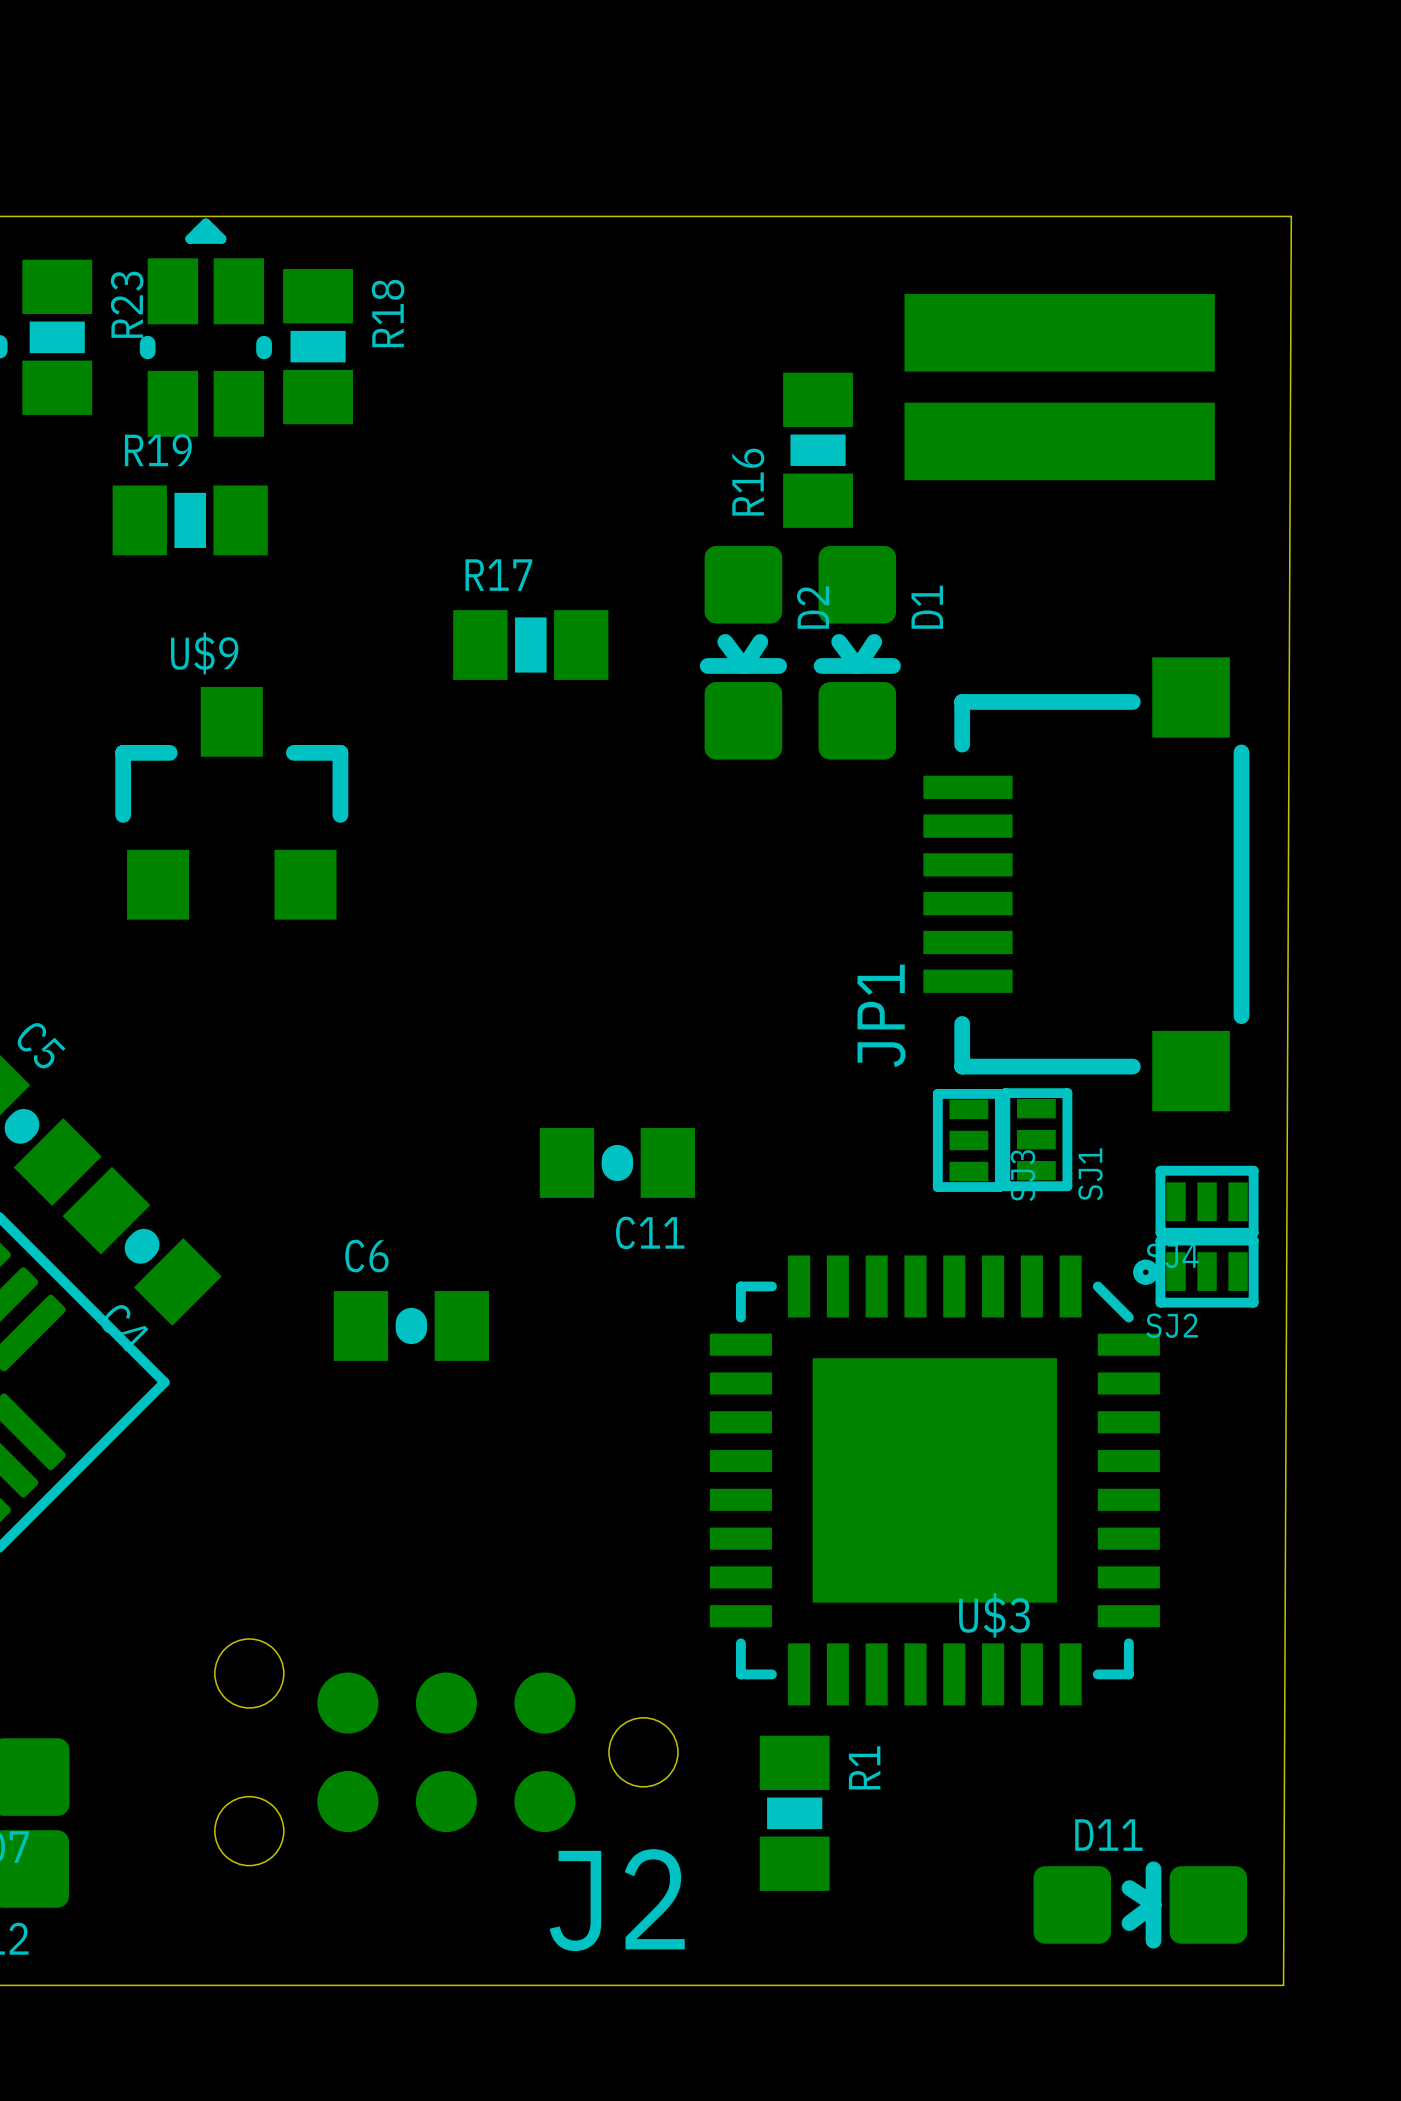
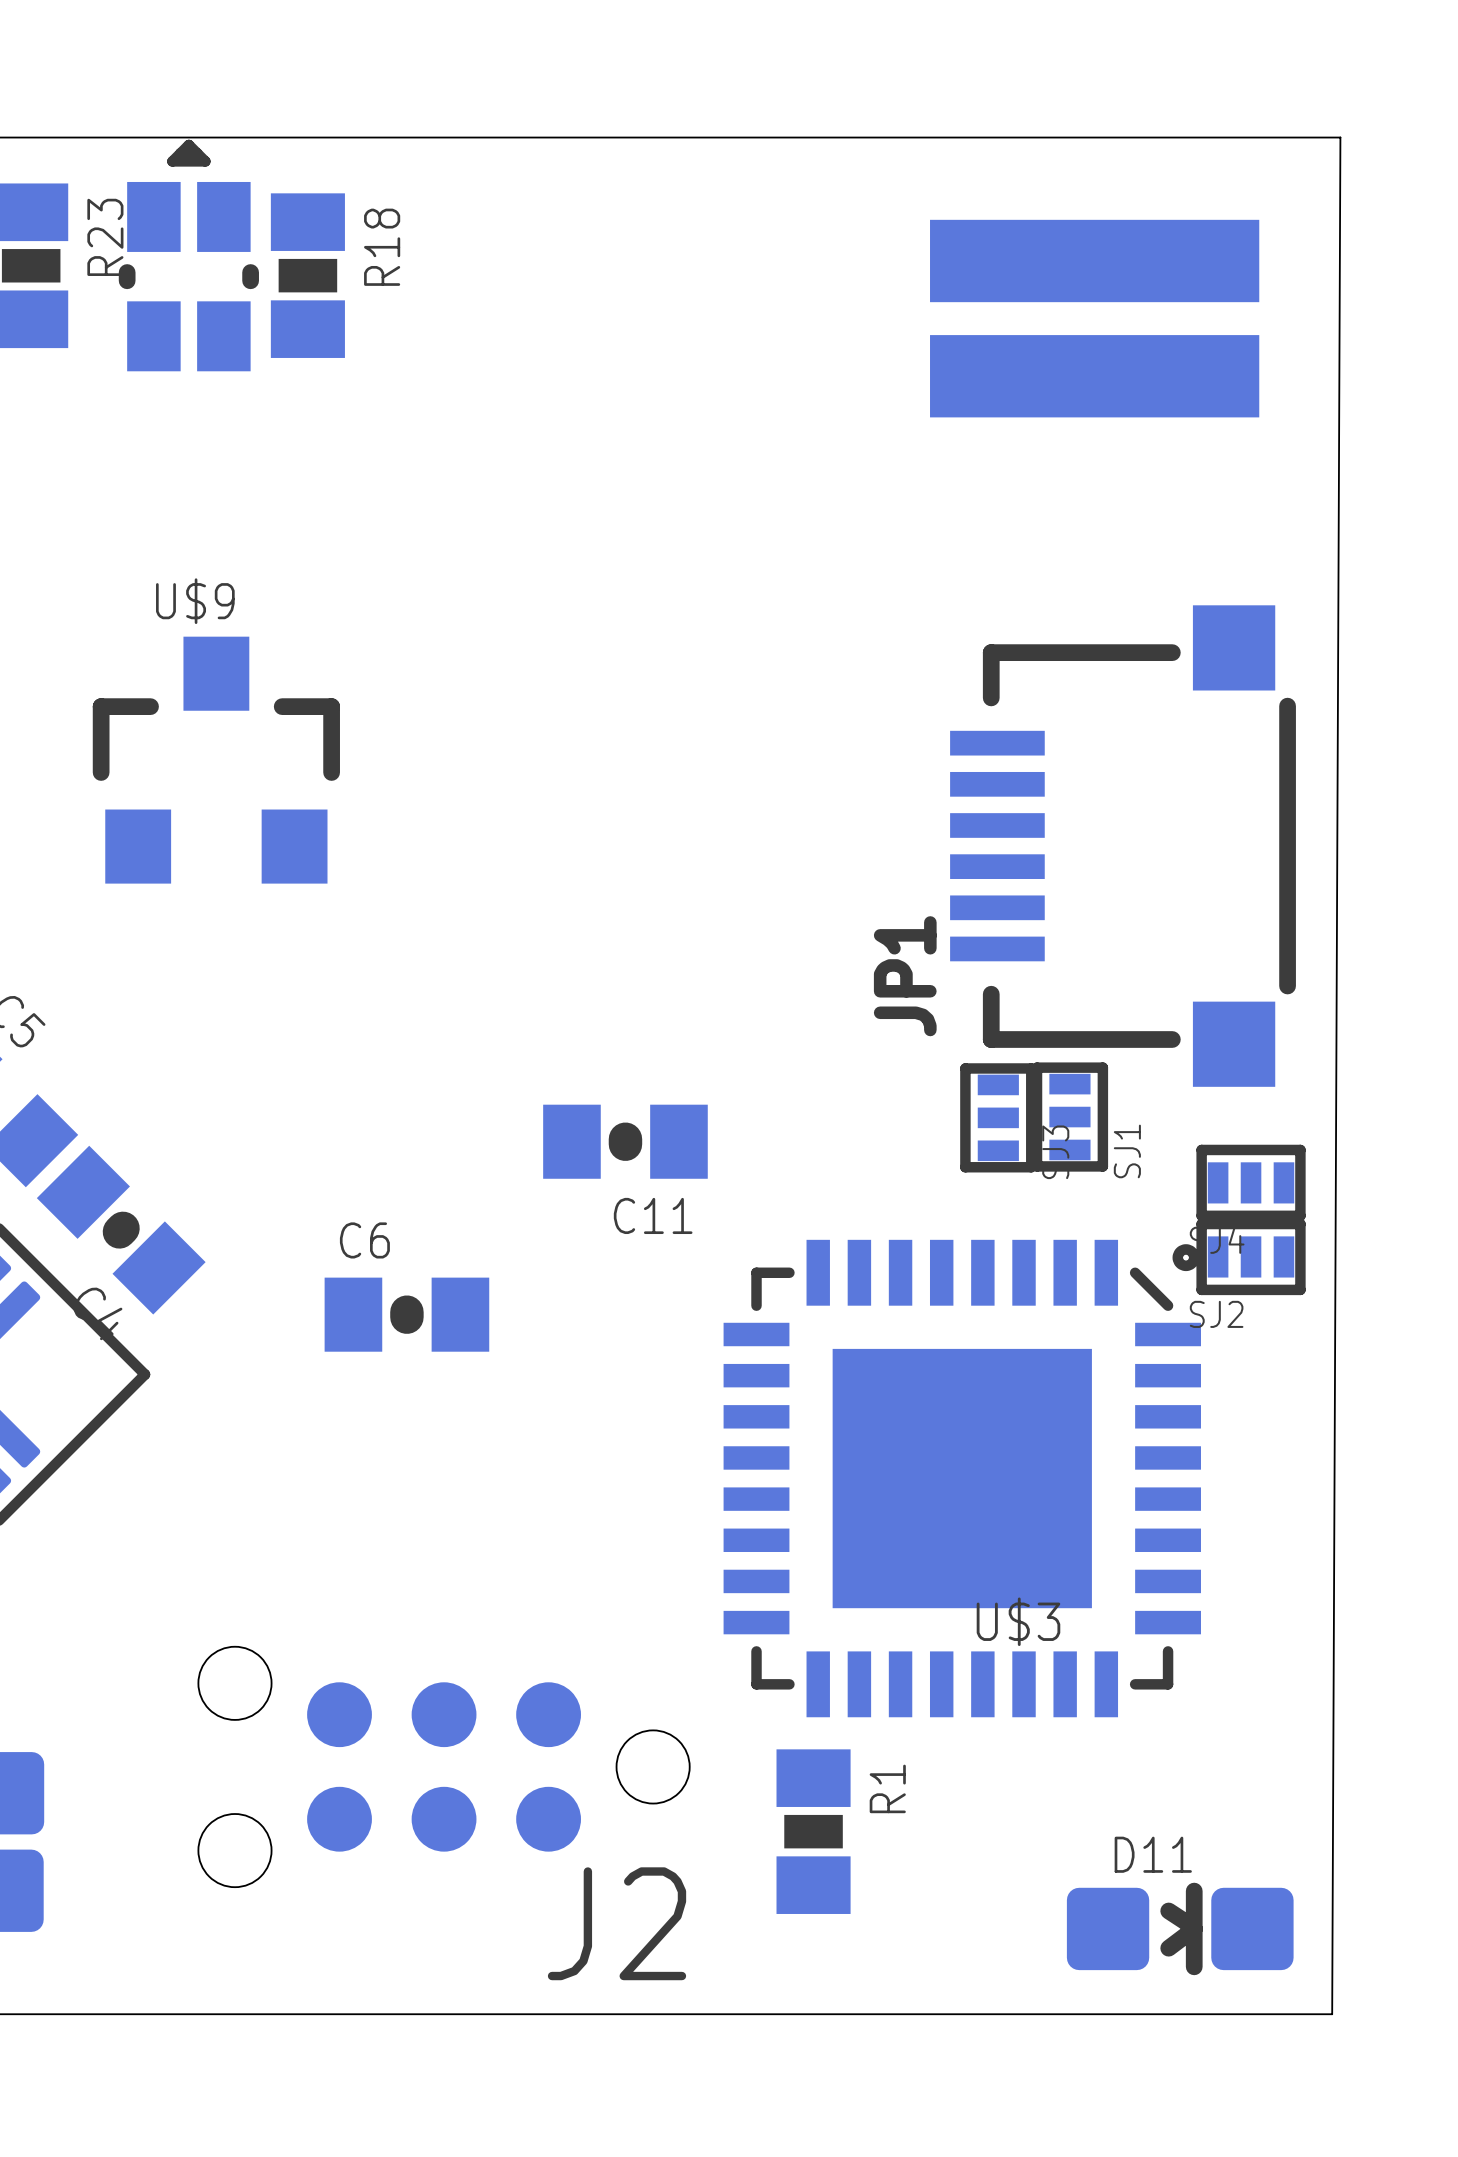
R16: (818, 450) -> none
R19: (190, 520) -> none
R17: (530, 645) -> none
D2: (743, 652) -> none
D1: (857, 652) -> none

